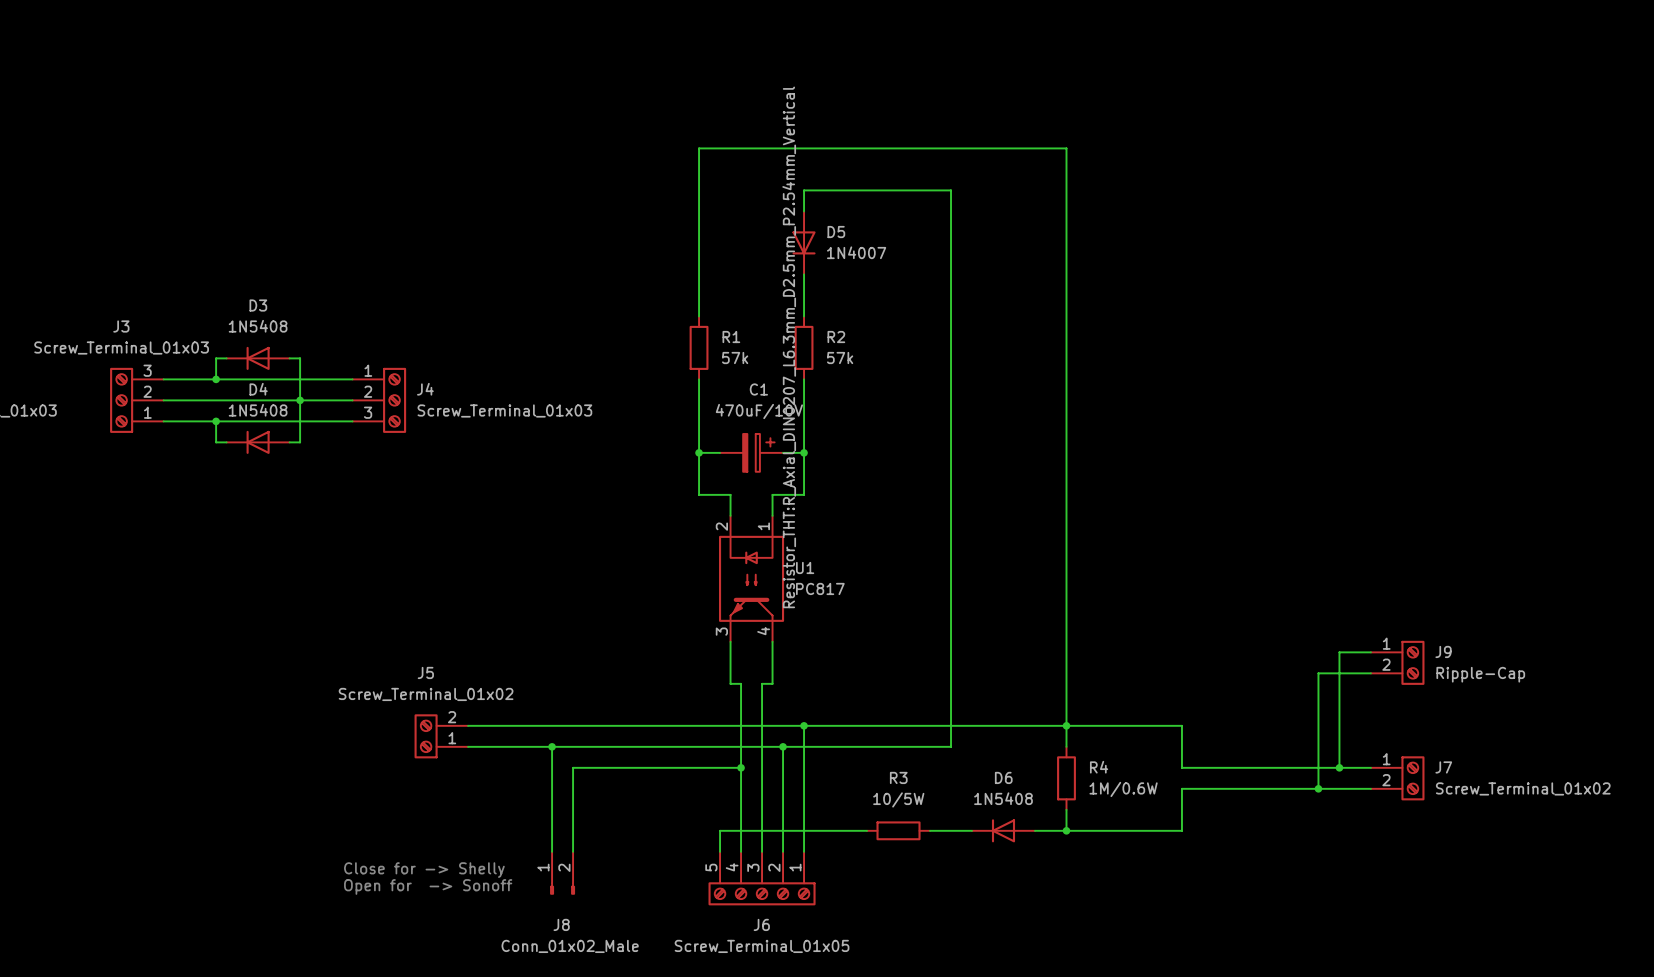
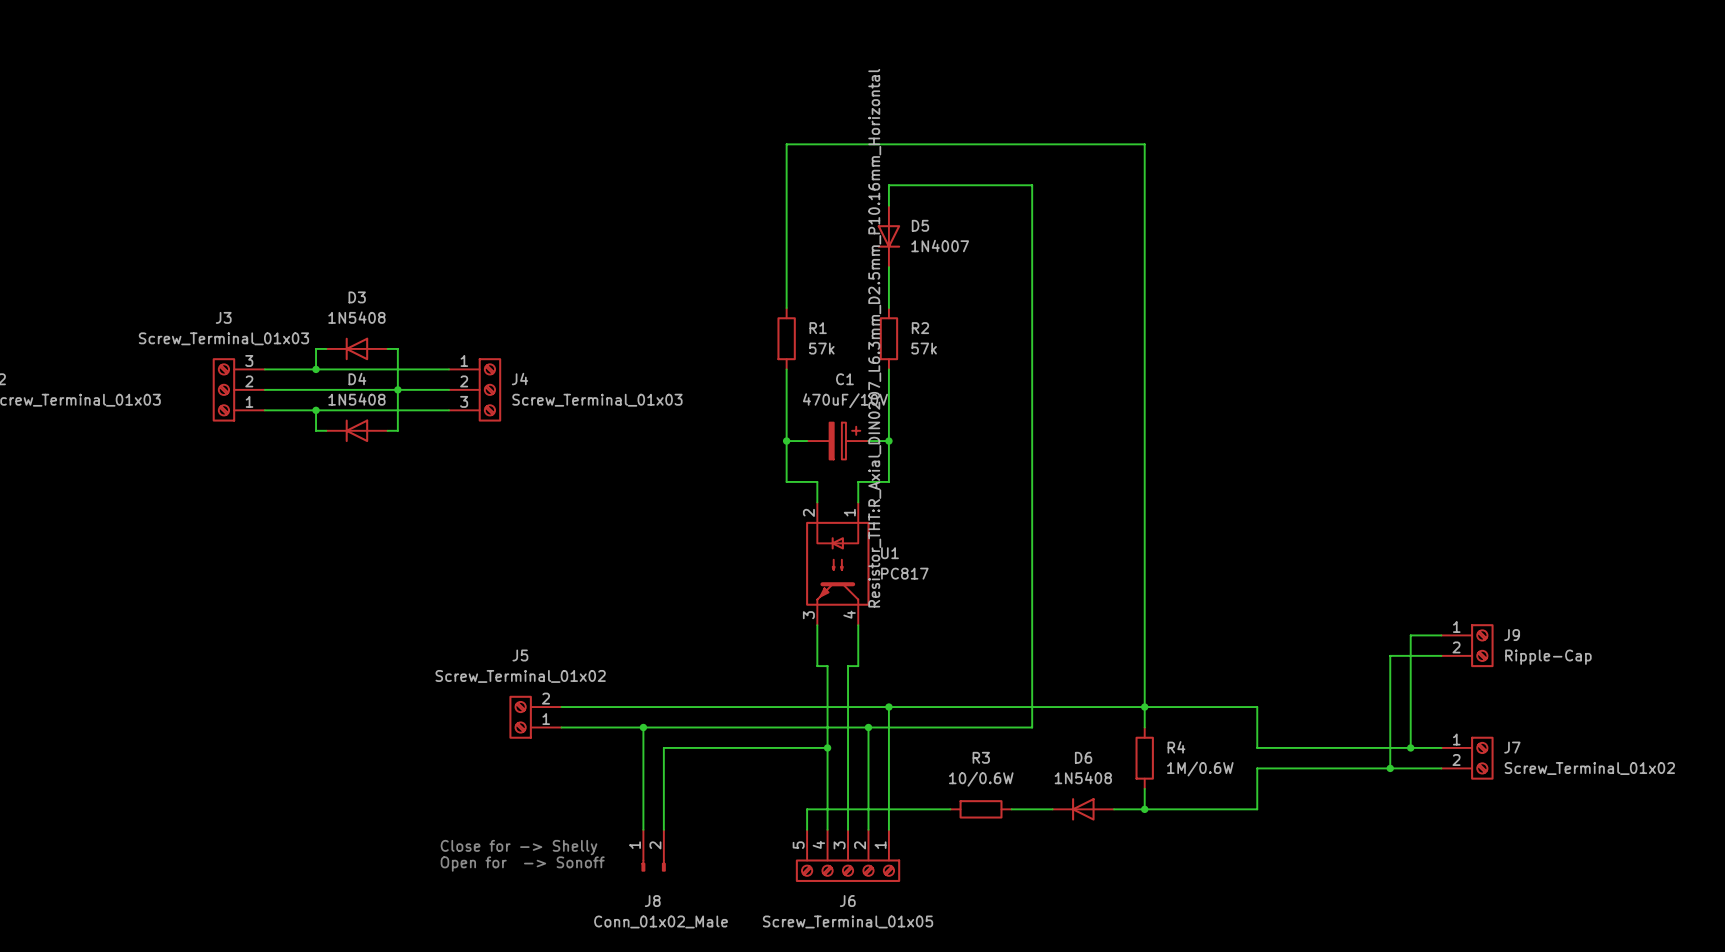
R2 text: Resistor_THT:R_Axial_DIN0207_L6.3mm_D2.5mm_P2.54mm_Vertical (789, 347) -> Resistor_THT:R_Axial_DIN0207_L6.3mm_D2.5mm_P10.16mm_Horizontal (874, 338)
R3 value: 10/5W (898, 799) -> 10/0.6W (981, 779)

